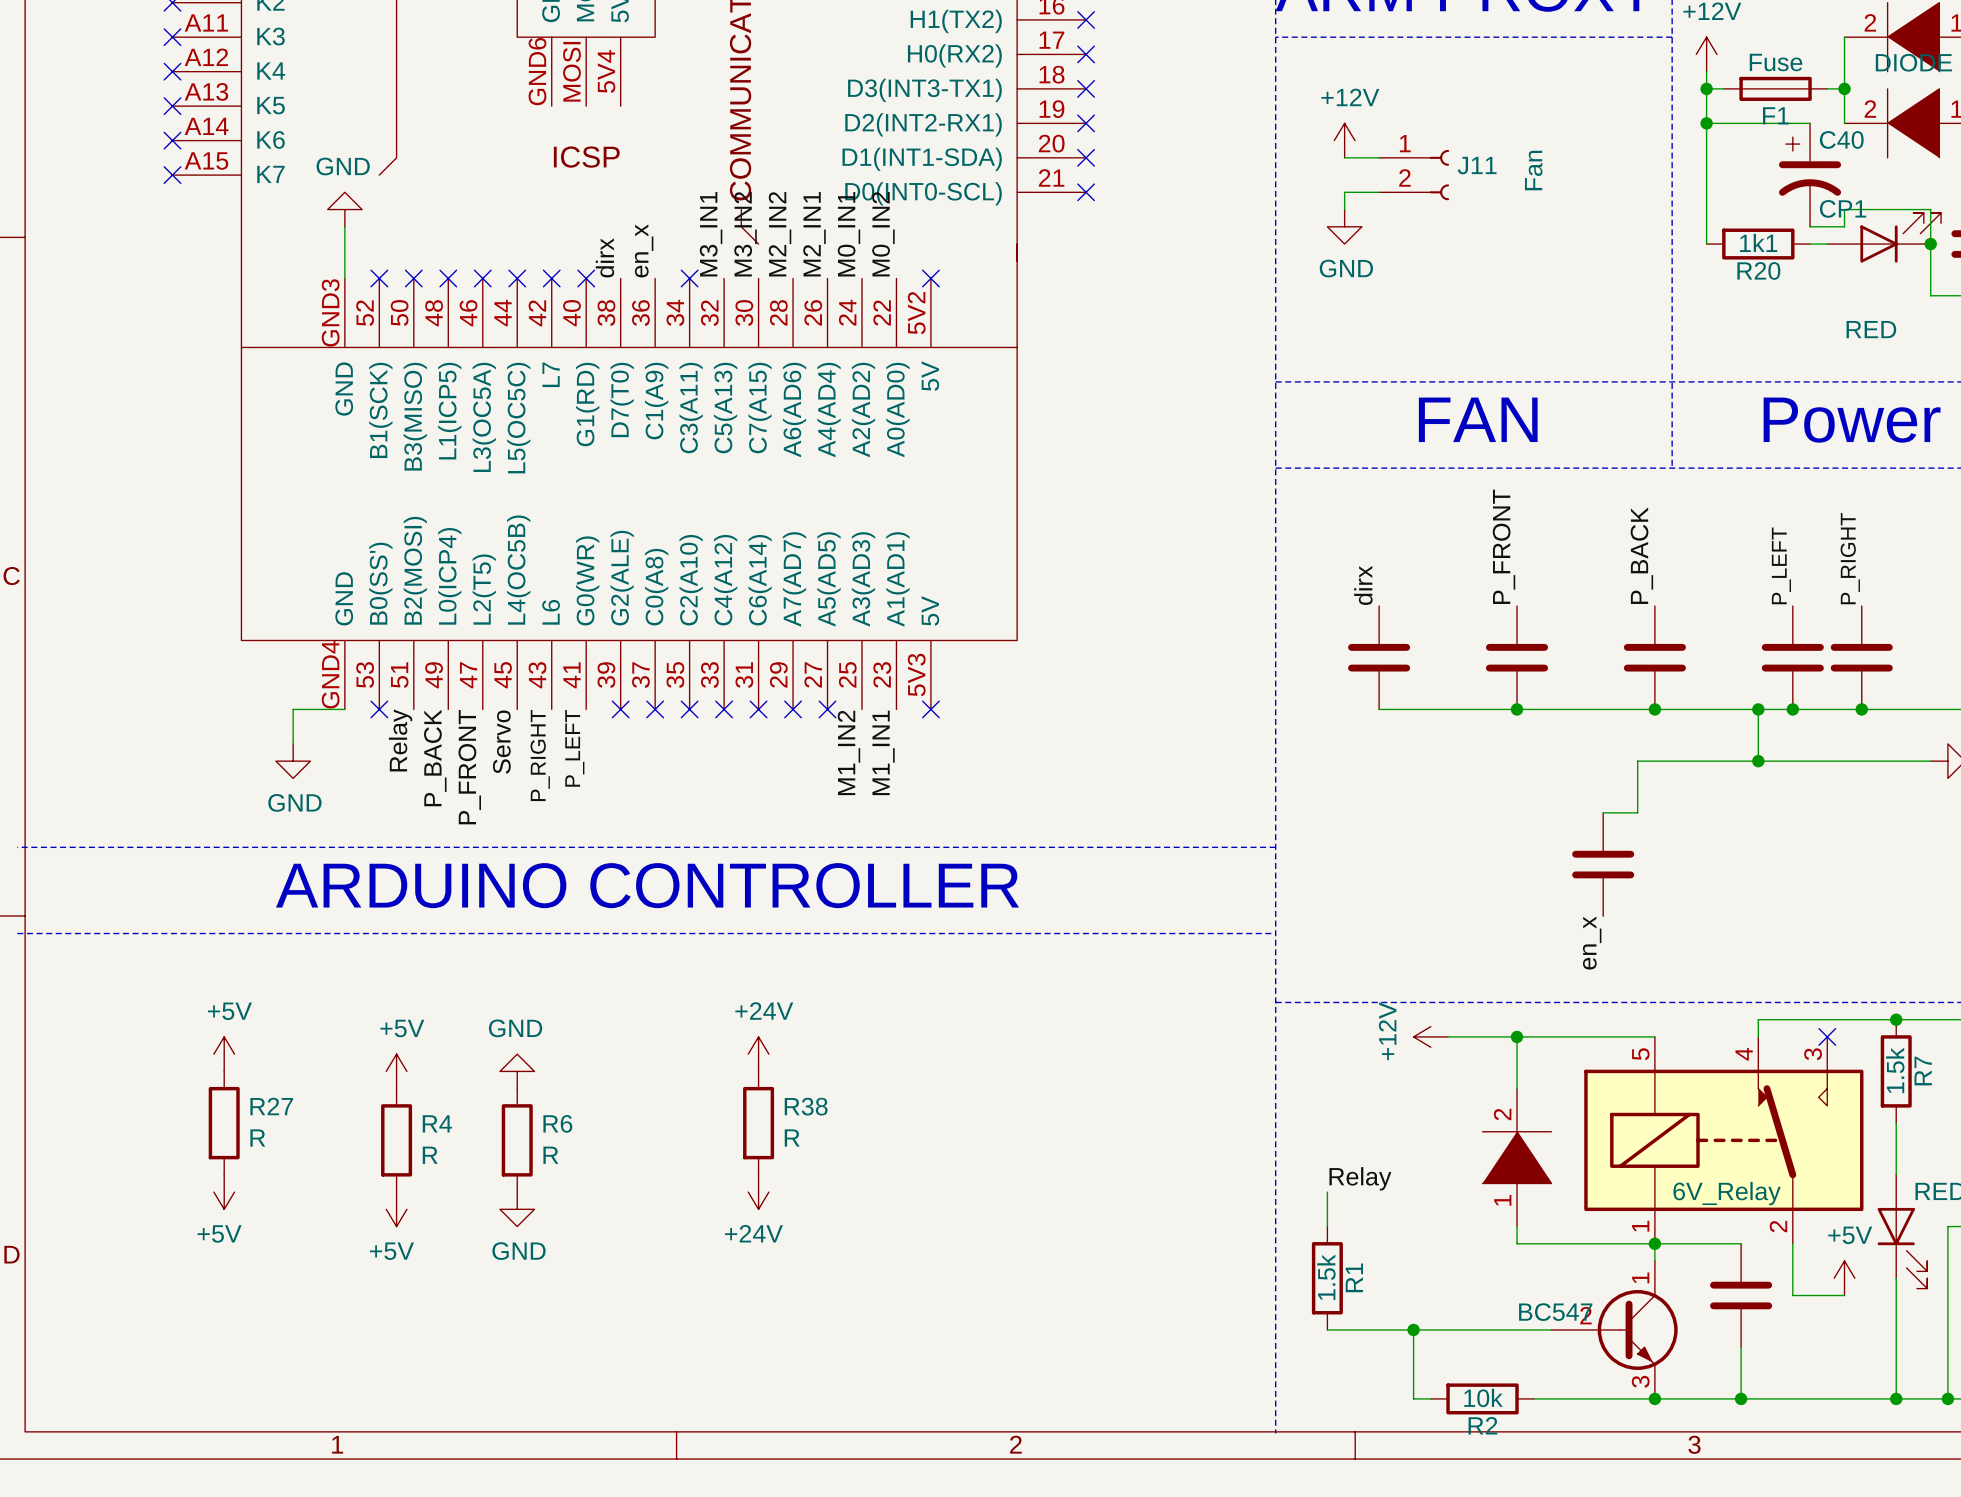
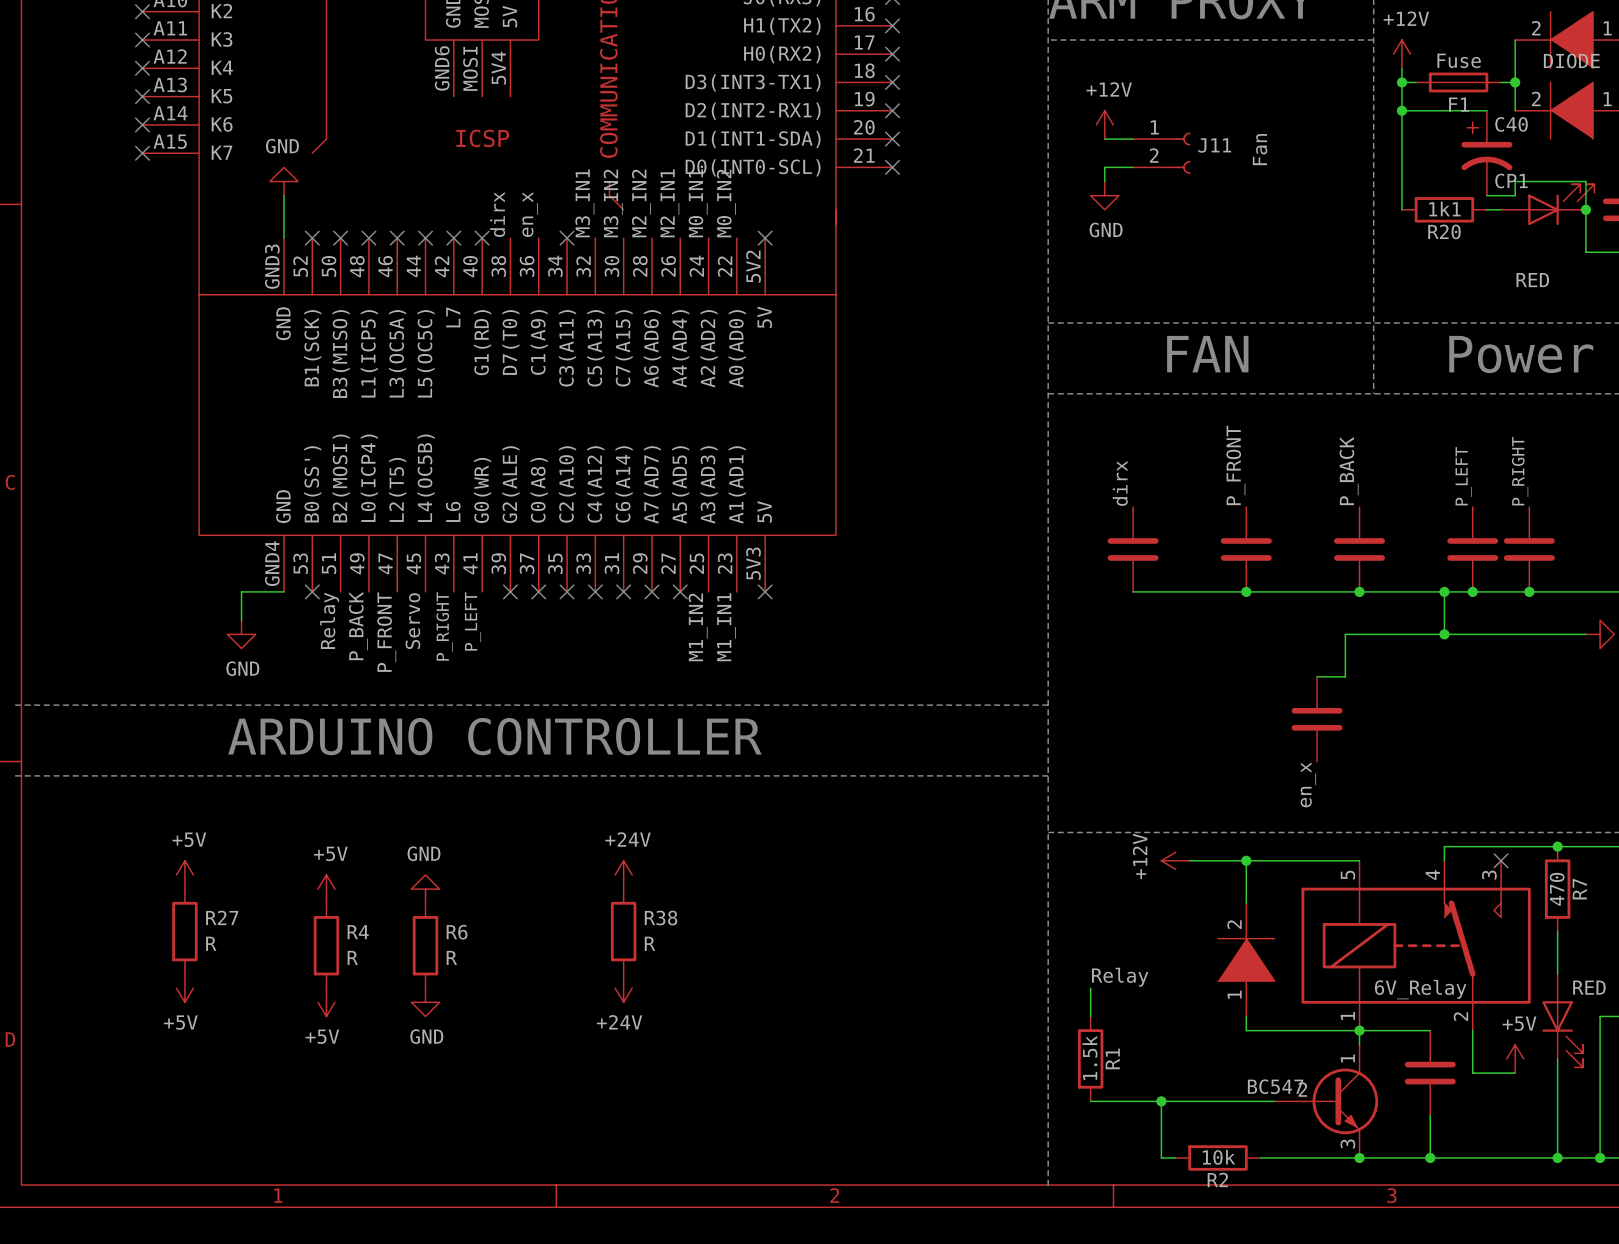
R7 value: 1.5k (1895, 1070) -> 470 (1557, 889)

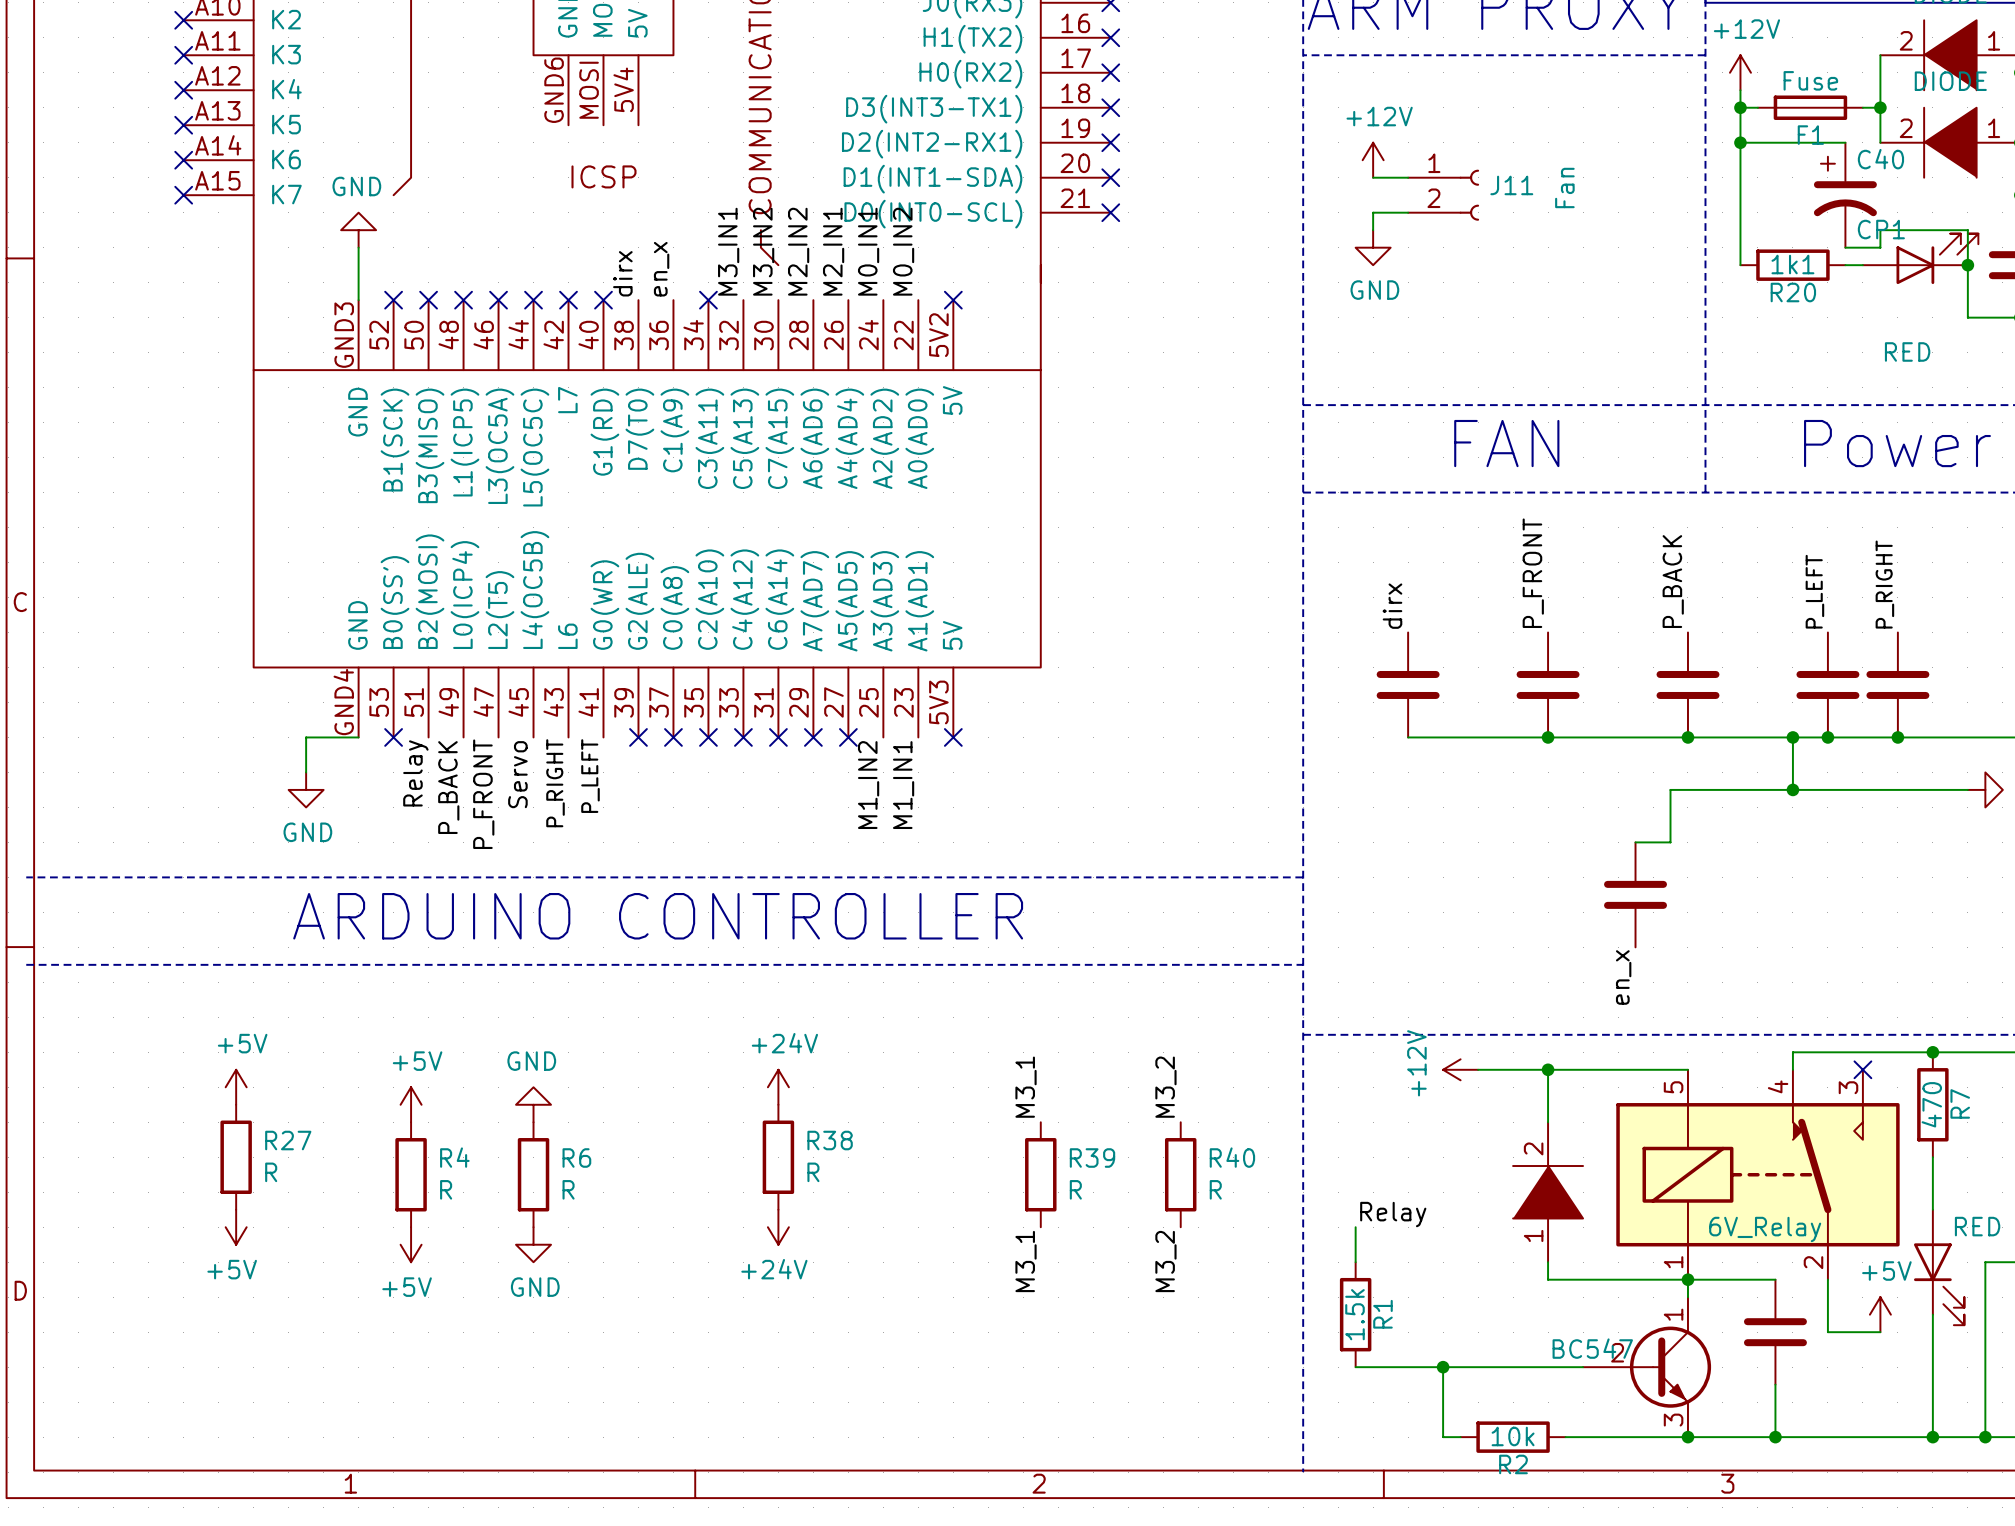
label: none -> M3_1 (1026, 1087)
label: none -> M3_2 (1165, 1087)
R39: none -> R (1040, 1174)
R40: none -> R (1180, 1174)
label: none -> M3_1 (1026, 1261)
label: none -> M3_2 (1165, 1261)

